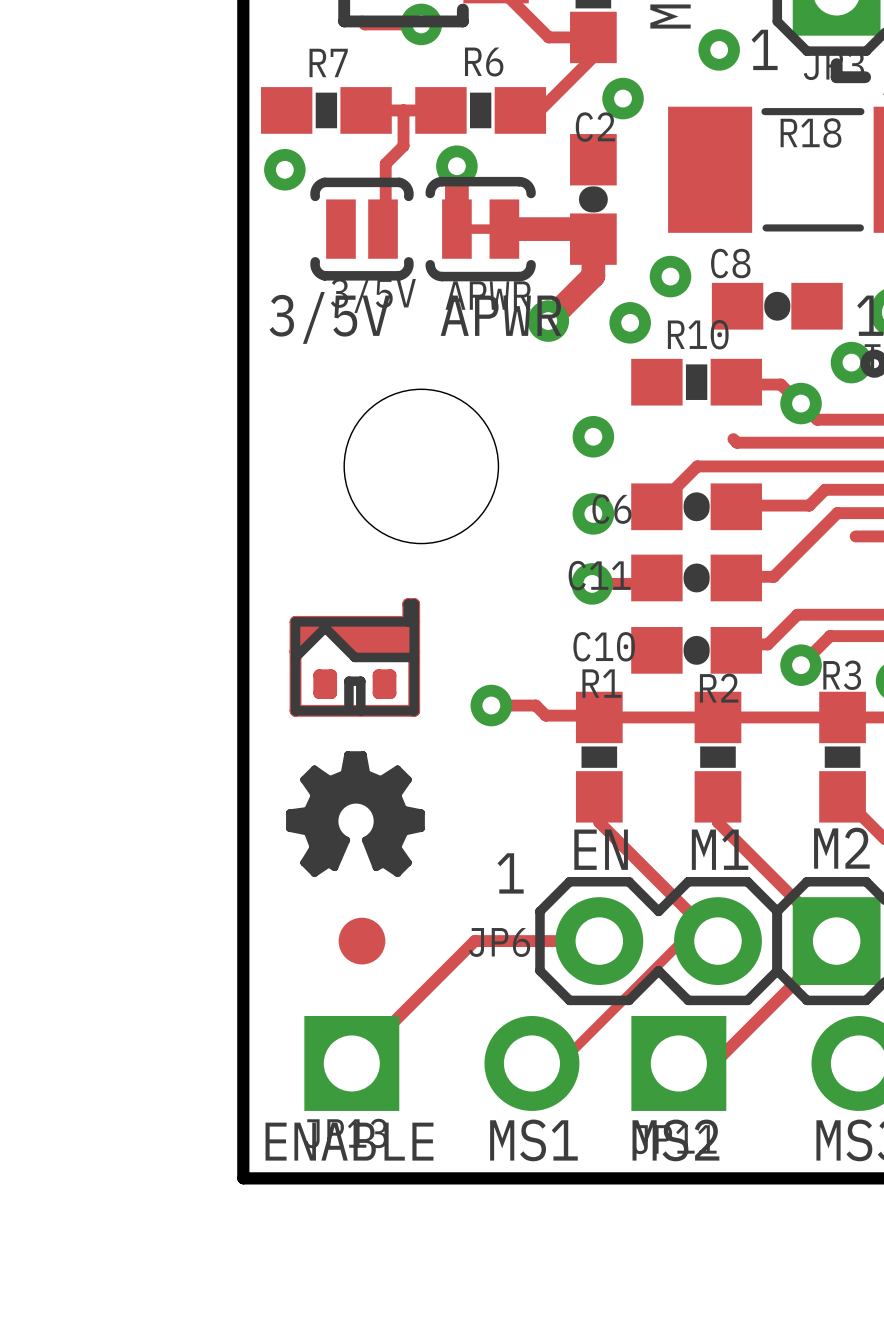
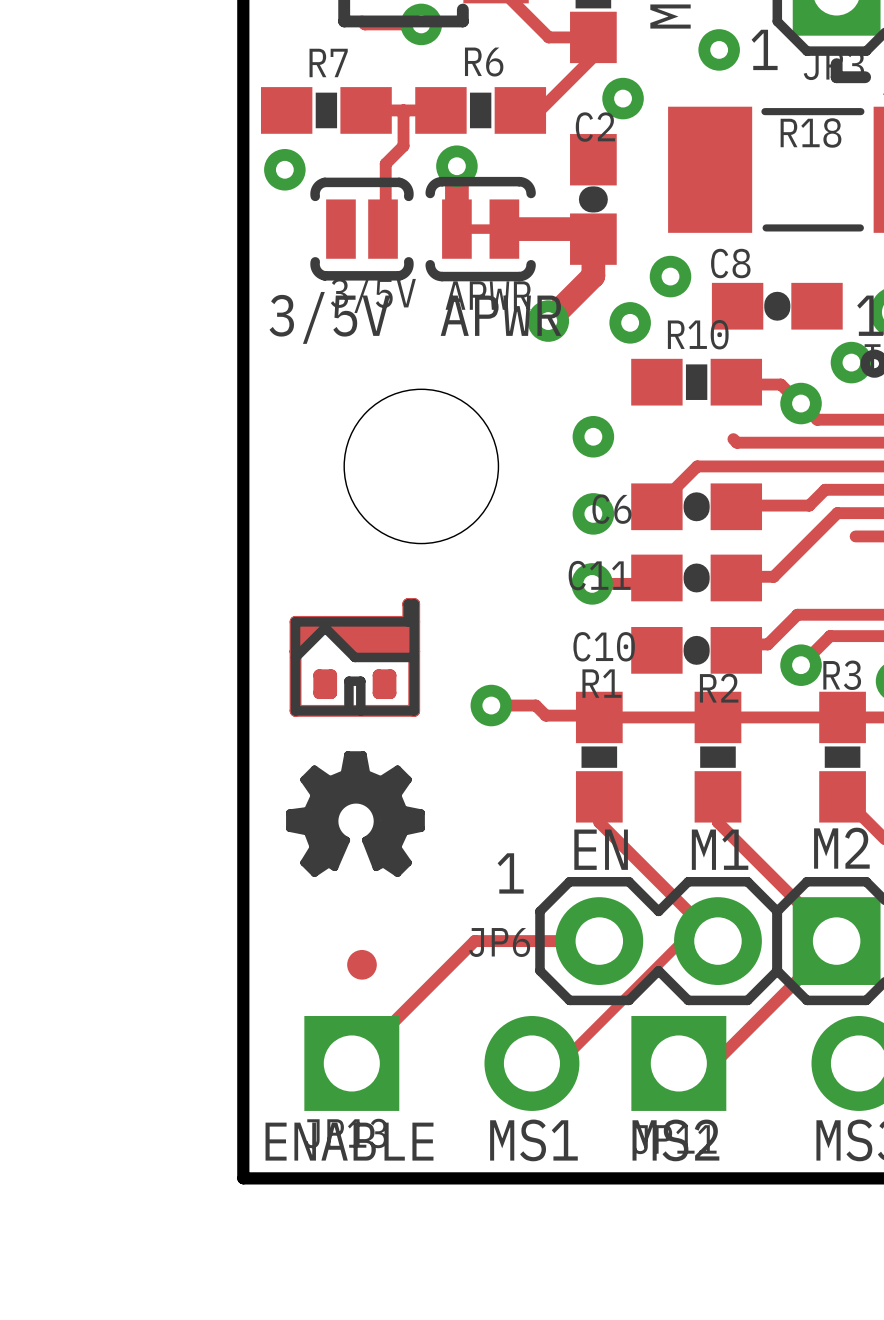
part footprint: [338, 917, 386, 965] -> [347, 949, 377, 980]

